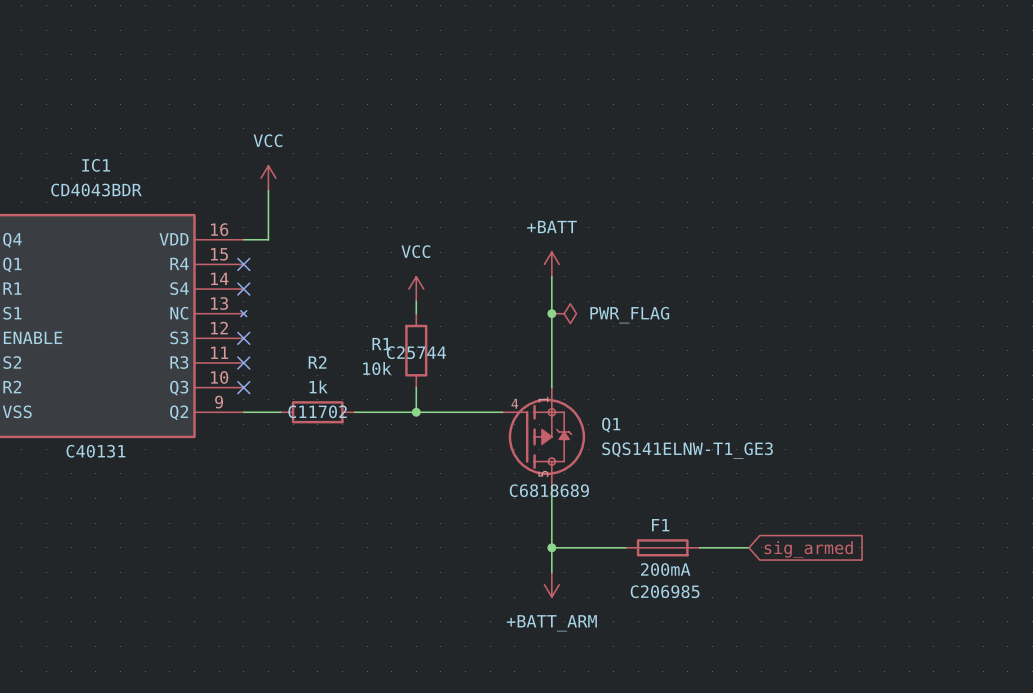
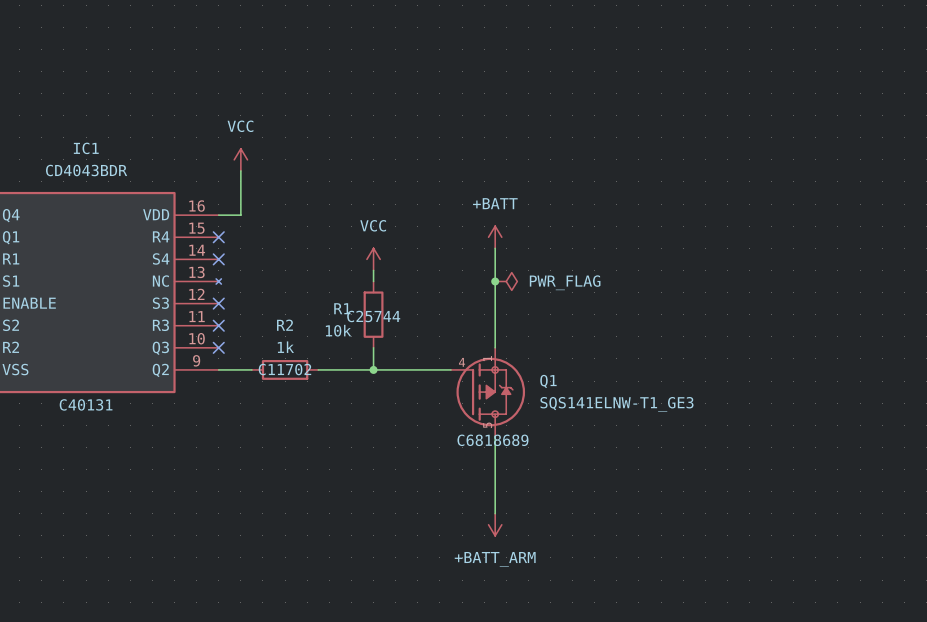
wire: (551, 547) (625, 547) -> none
junction: (551, 547) -> none
F1: 200mA (662, 547) -> none
wire: (699, 547) (748, 547) -> none
global label: sig_armed (808, 549) -> none

